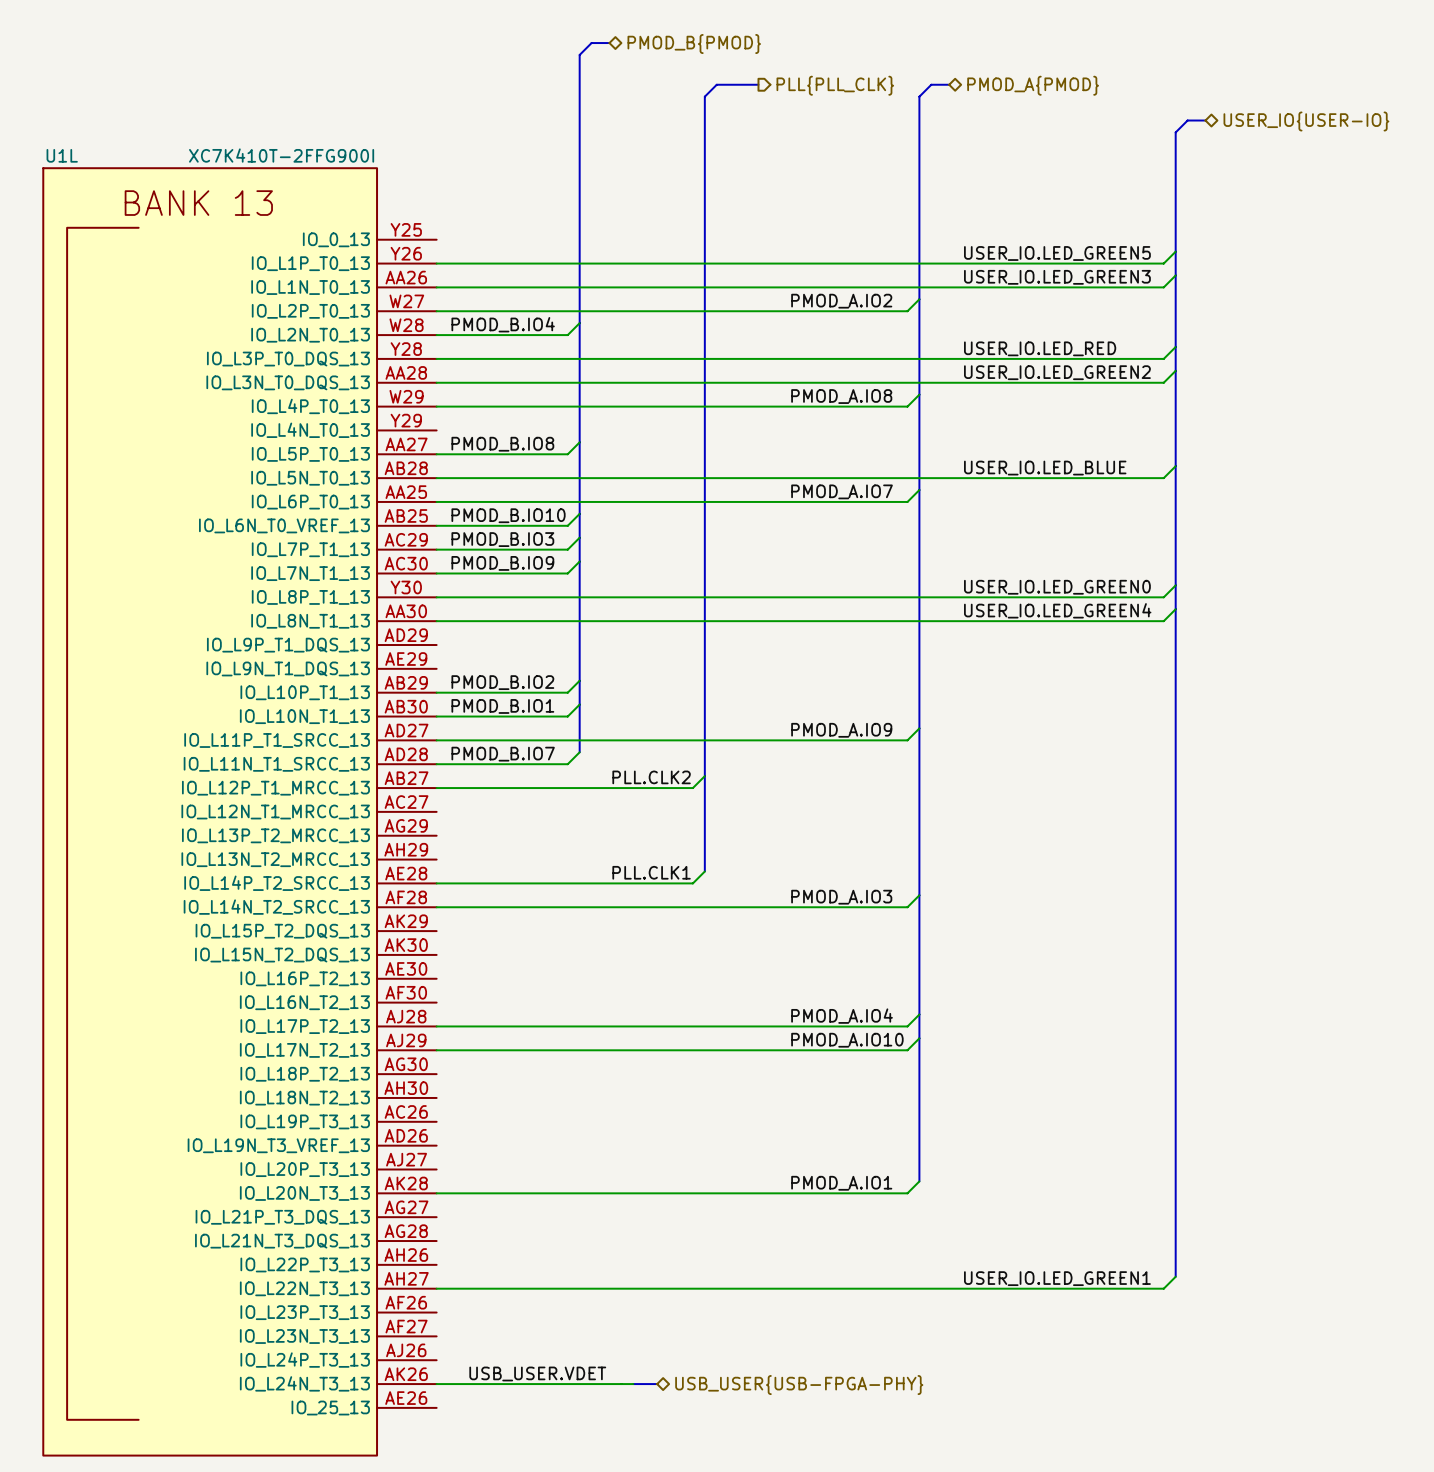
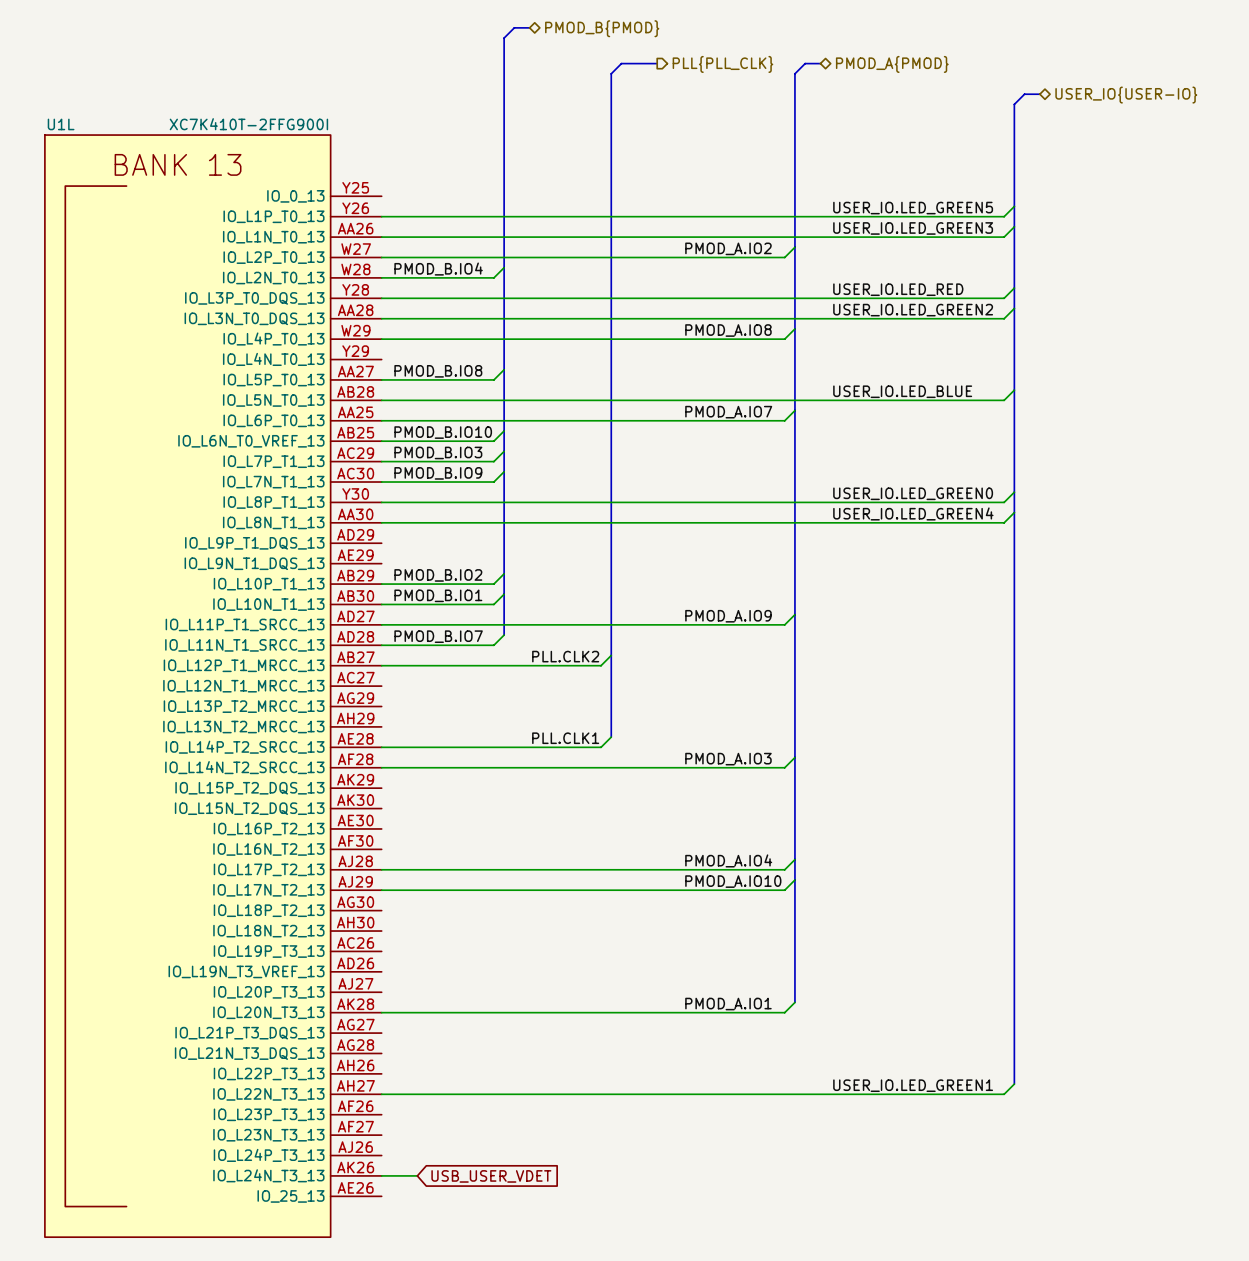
label: USB_USER.VDET (537, 1373) -> none
wire: (478, 1384) (633, 1384) -> none
global label: none -> USB_USER_VDET (491, 1176)
bus: (633, 1384) (657, 1384) -> none
hierarchical label: USB_USER{USB-FPGA-PHY} (799, 1385) -> none

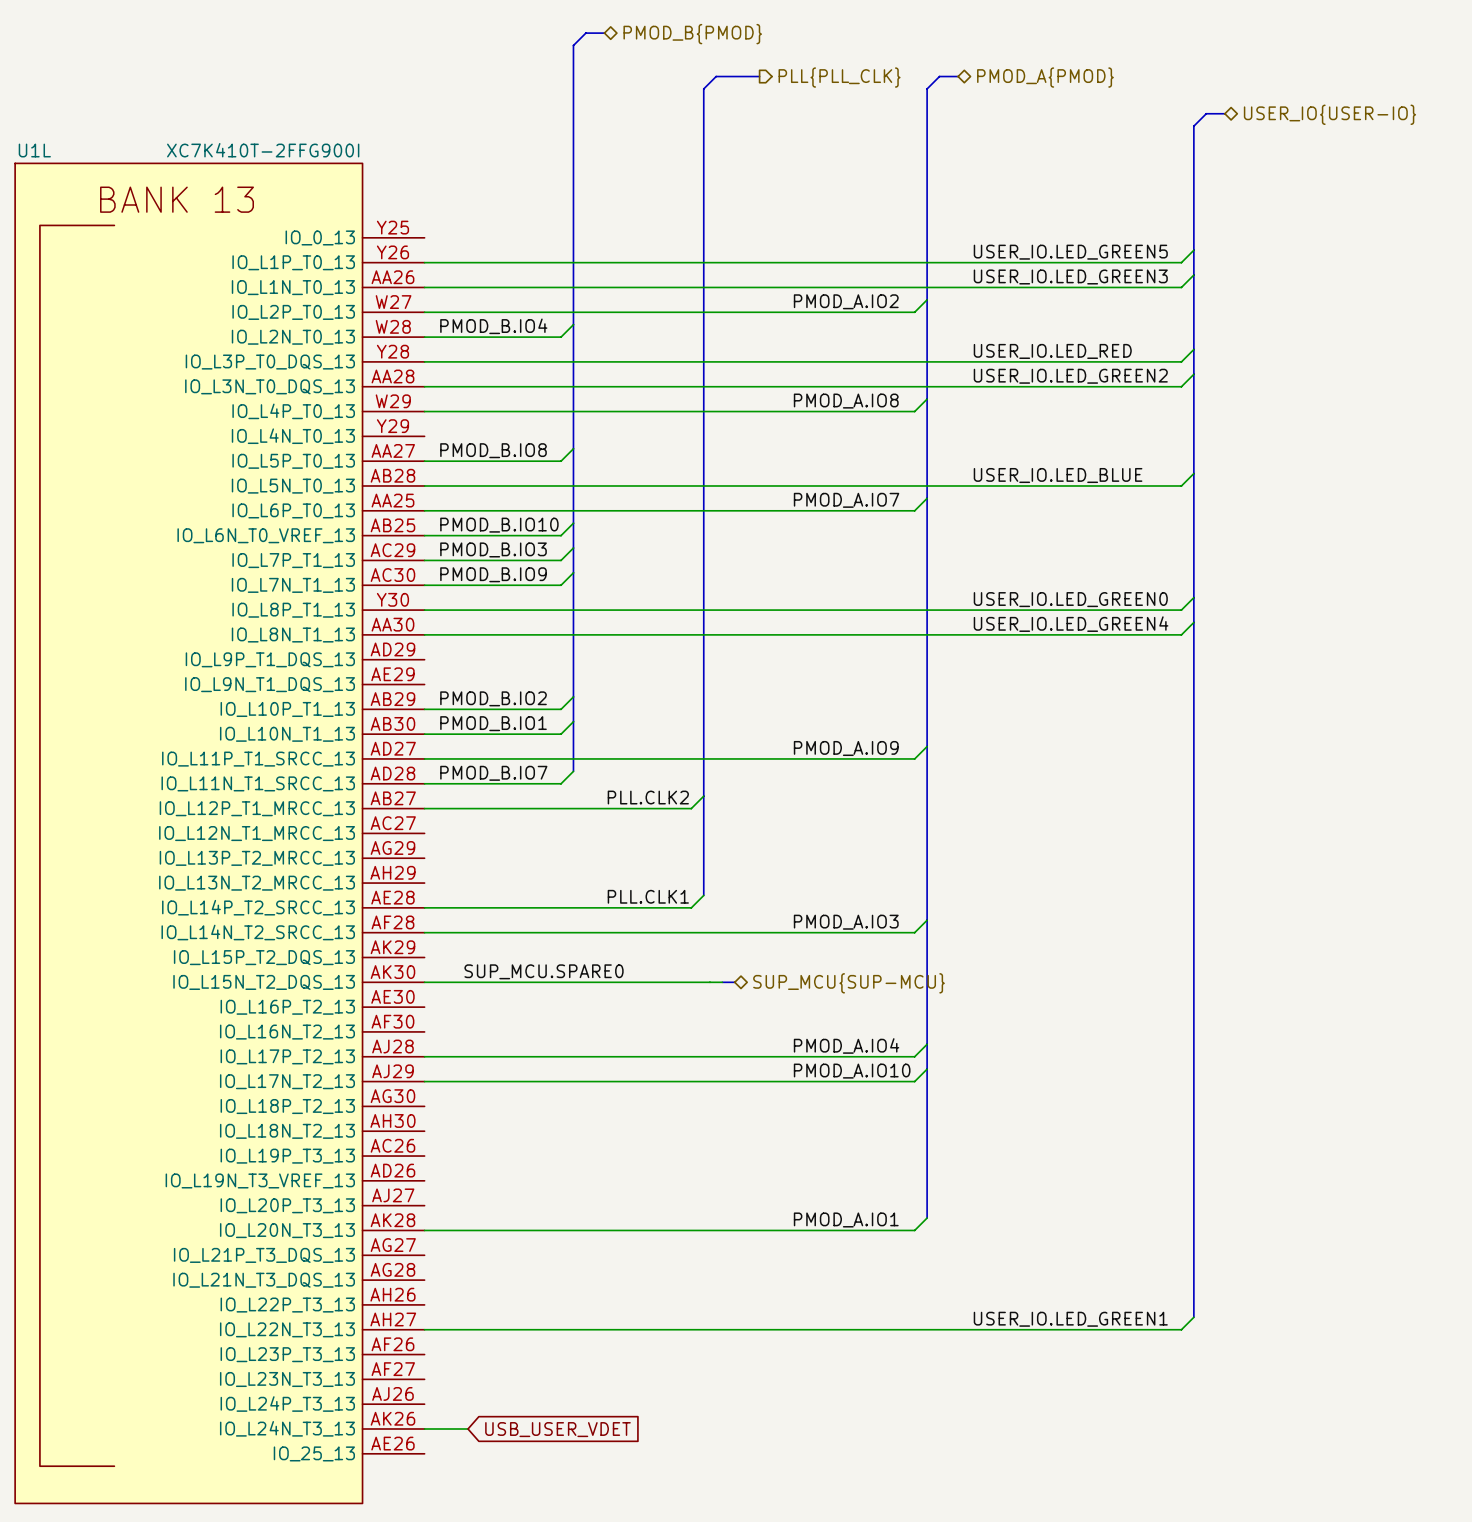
label: none -> SUP_MCU.SPARE0 (544, 971)
wire: none -> (424, 982) (722, 982)
bus: none -> (722, 982) (734, 982)
hierarchical label: none -> SUP_MCU{SUP-MCU} (849, 983)

